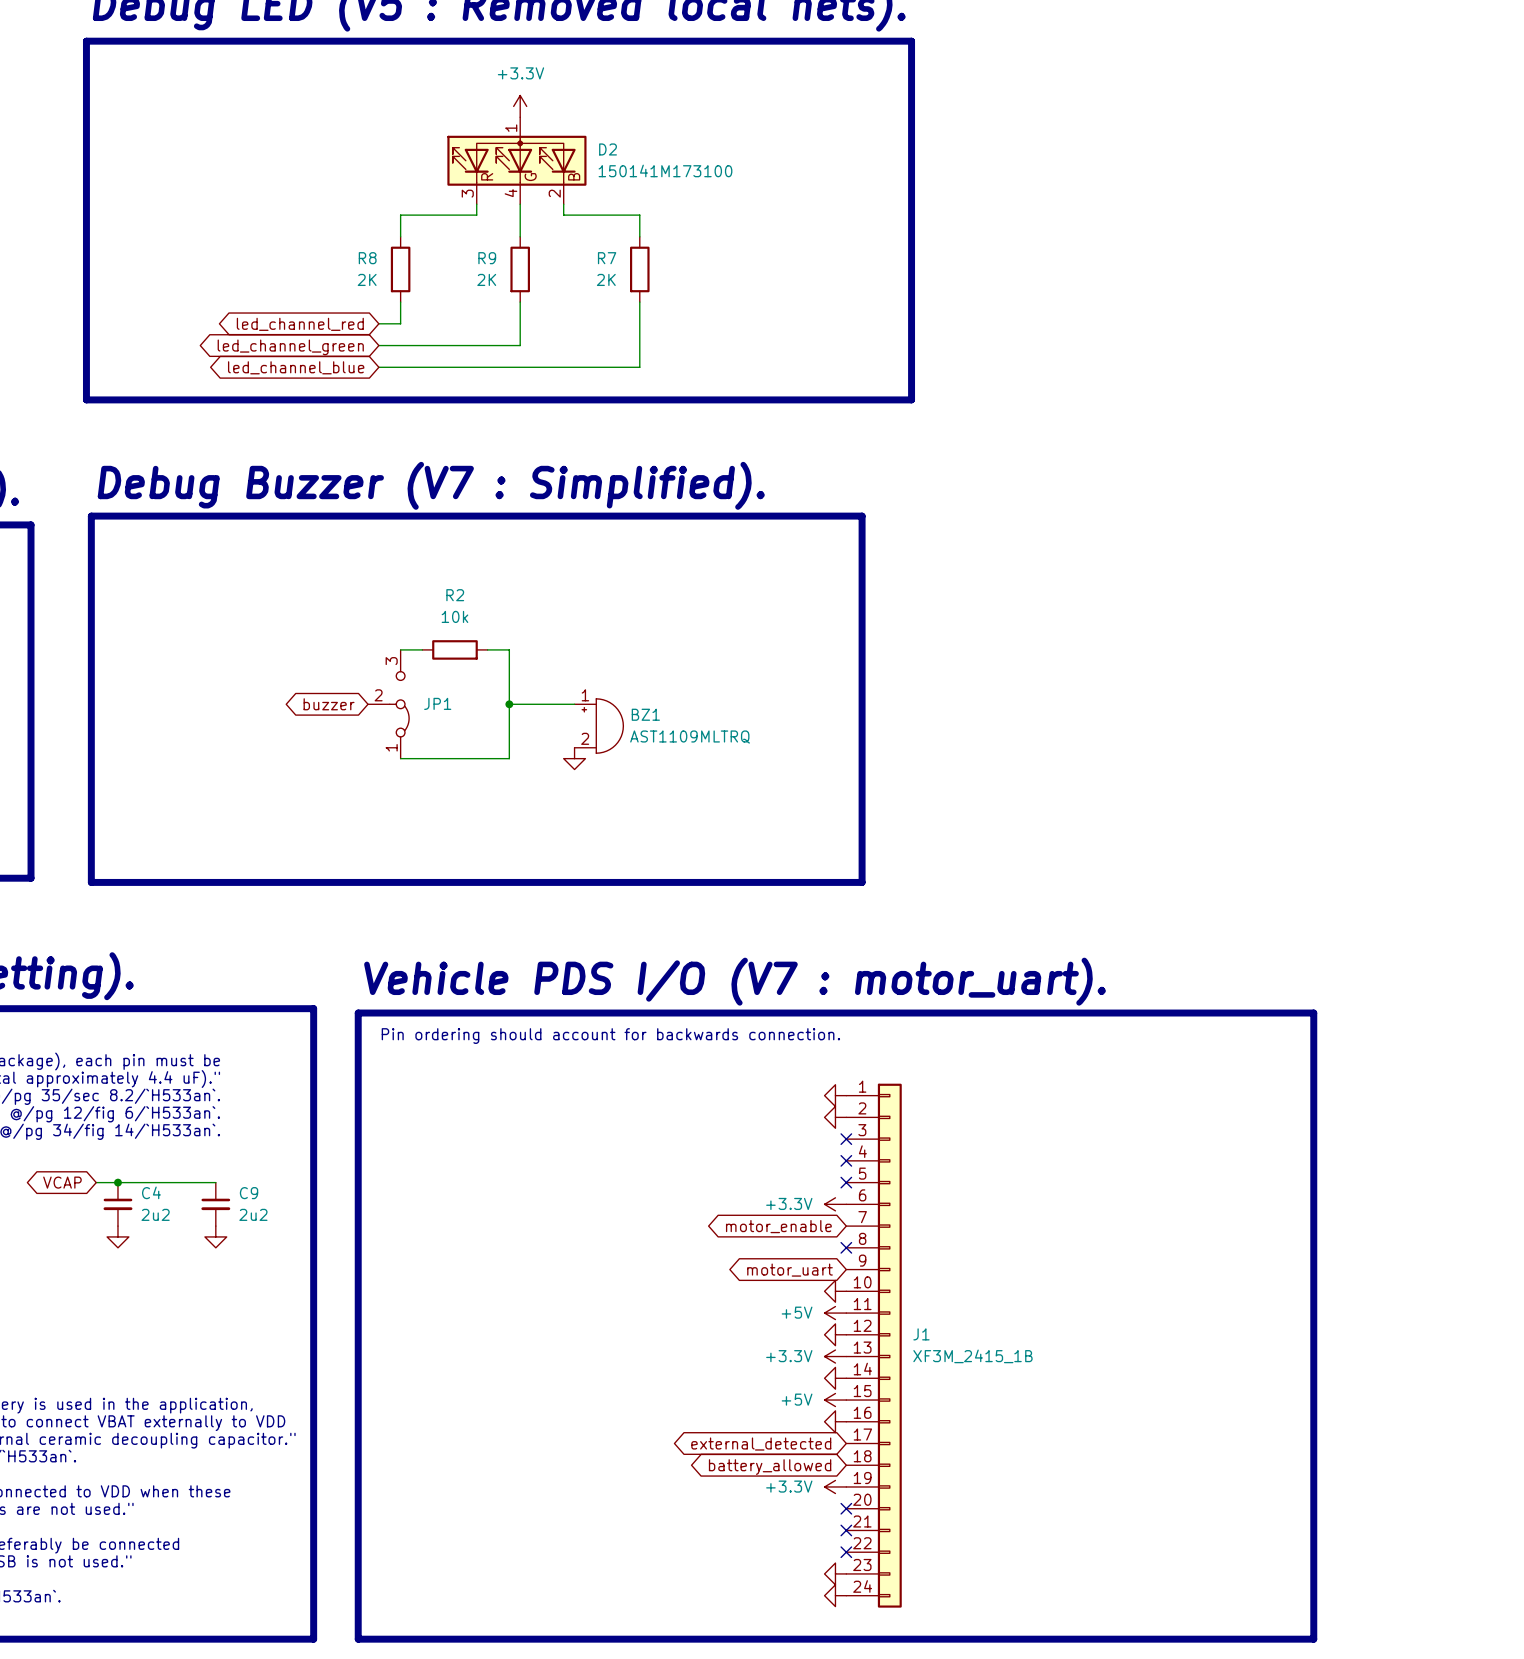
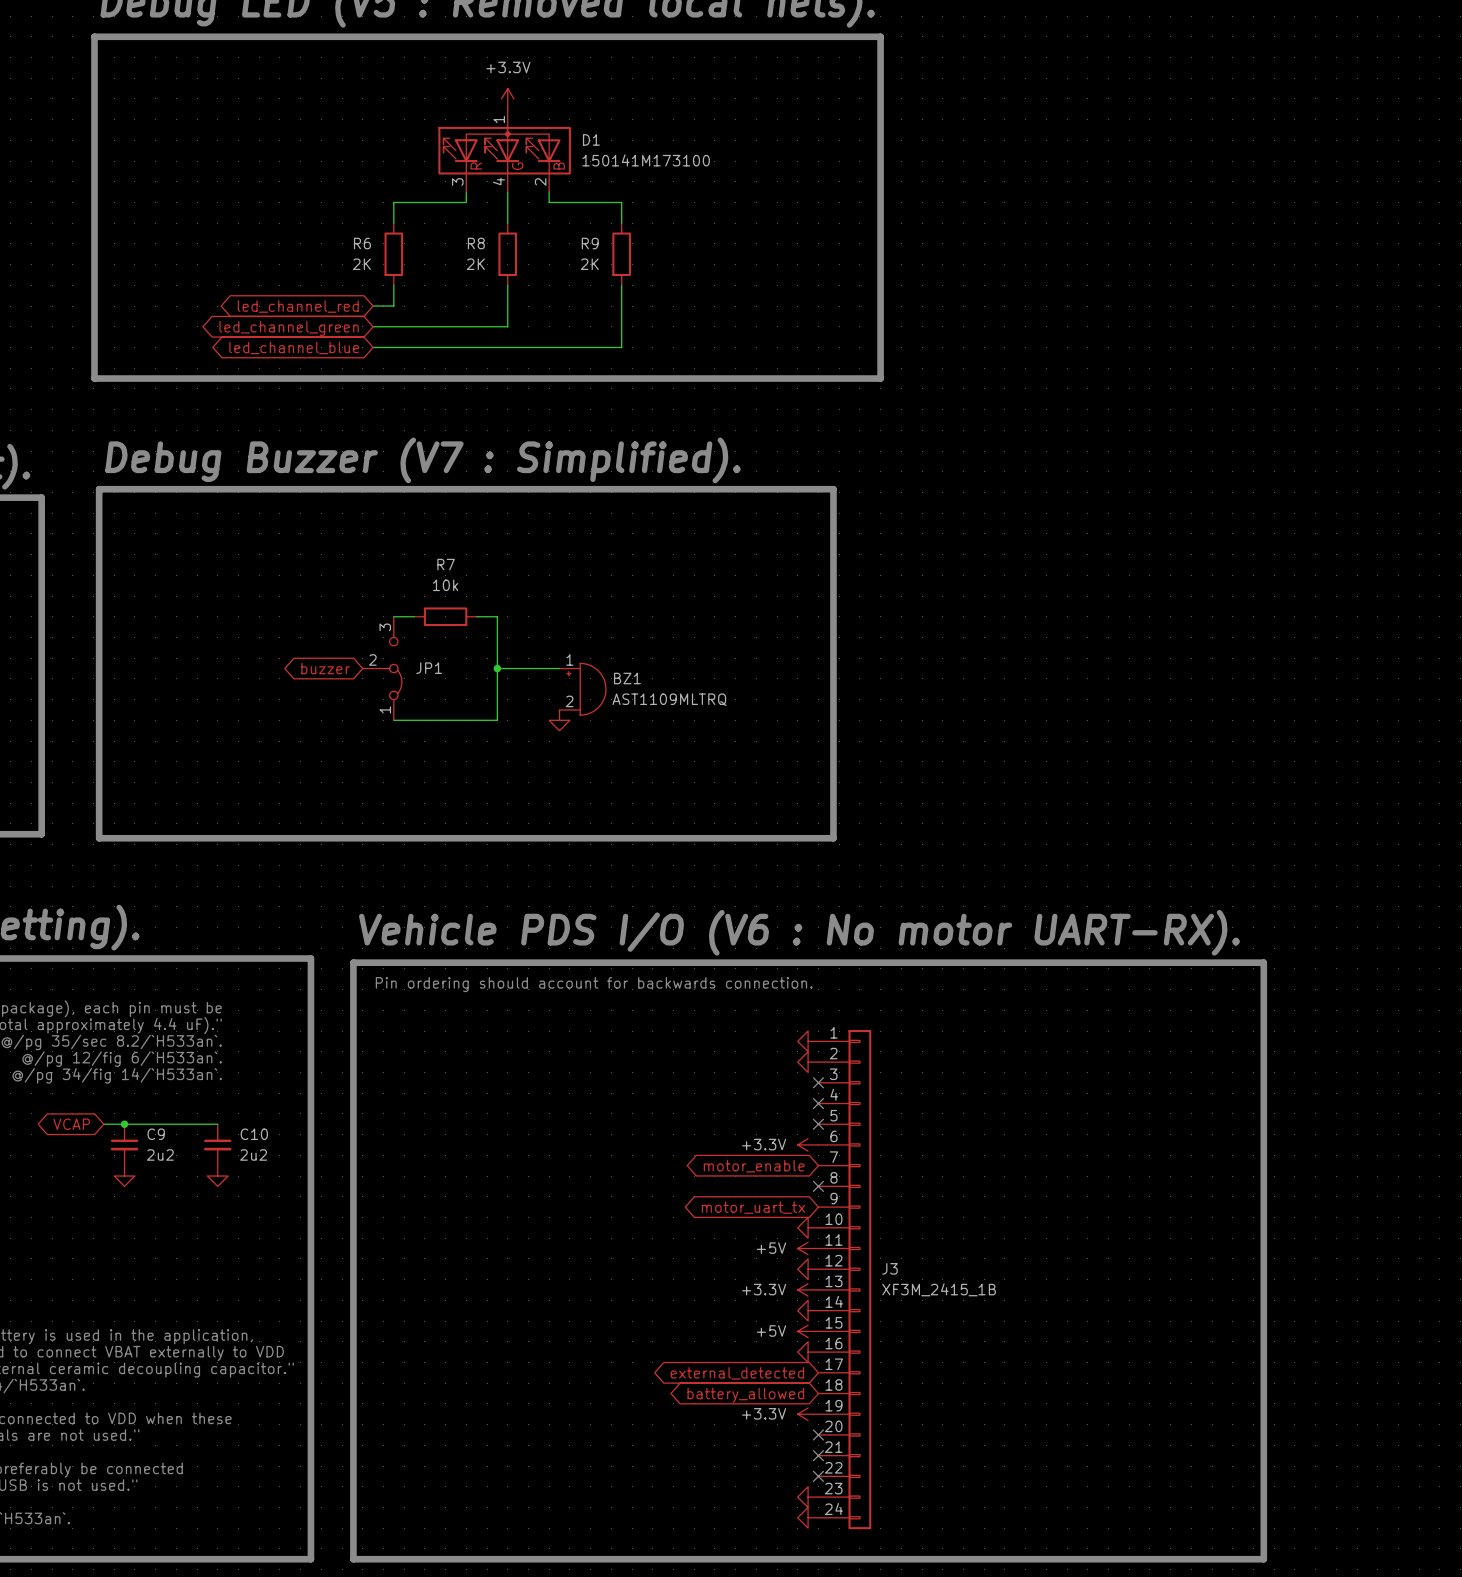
D2 name: D2 (608, 149) -> D1 (591, 139)
R8 name: R8 (367, 258) -> R6 (362, 243)
R9 name: R9 (487, 258) -> R8 (476, 243)
R7 name: R7 (607, 258) -> R9 (590, 243)
R2 name: R2 (455, 595) -> R7 (446, 564)
text: Vehicle PDS I/O (V7 : motor_uart). (735, 981) -> Vehicle PDS I/O (V6 : No motor UART-RX). (799, 932)
C4 name: C4 (151, 1192) -> C9 (156, 1134)
C9 name: C9 (249, 1193) -> C10 (254, 1134)
global label: motor_uart (790, 1270) -> motor_uart_tx (753, 1207)
J1 name: J1 (921, 1334) -> J3 (890, 1268)

